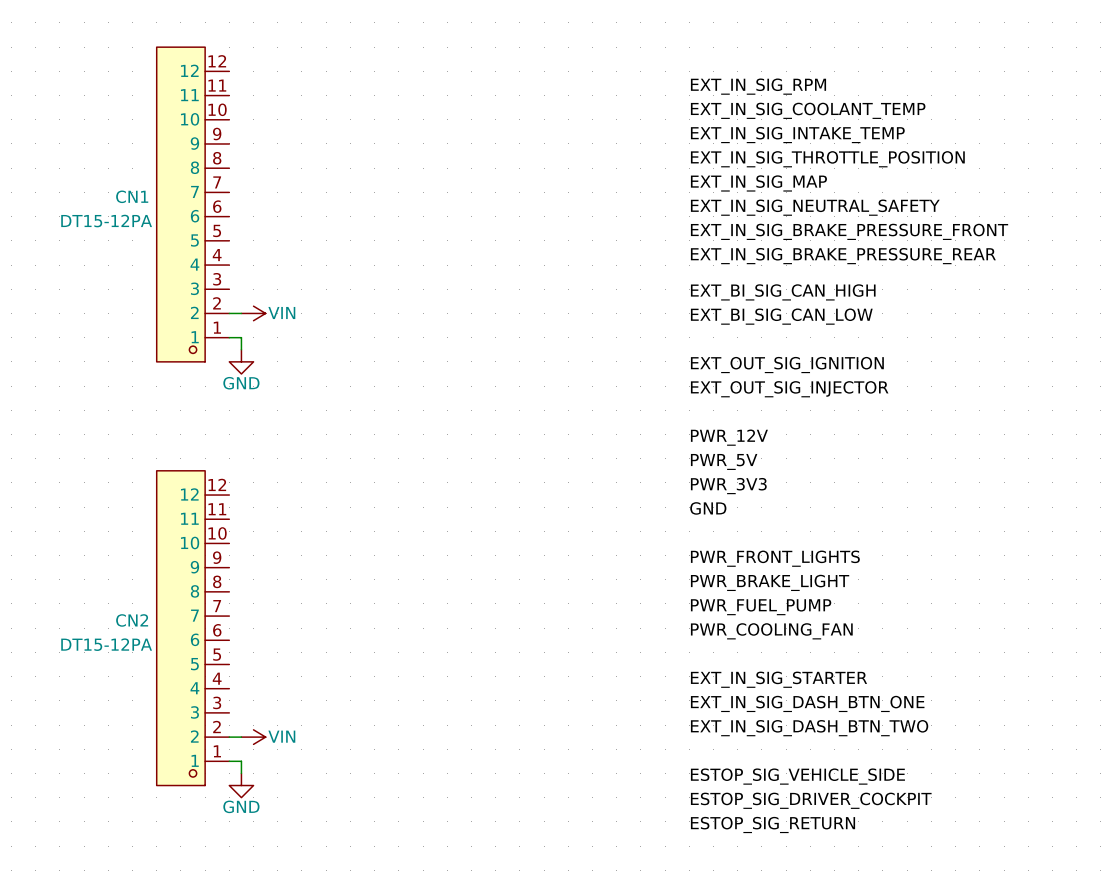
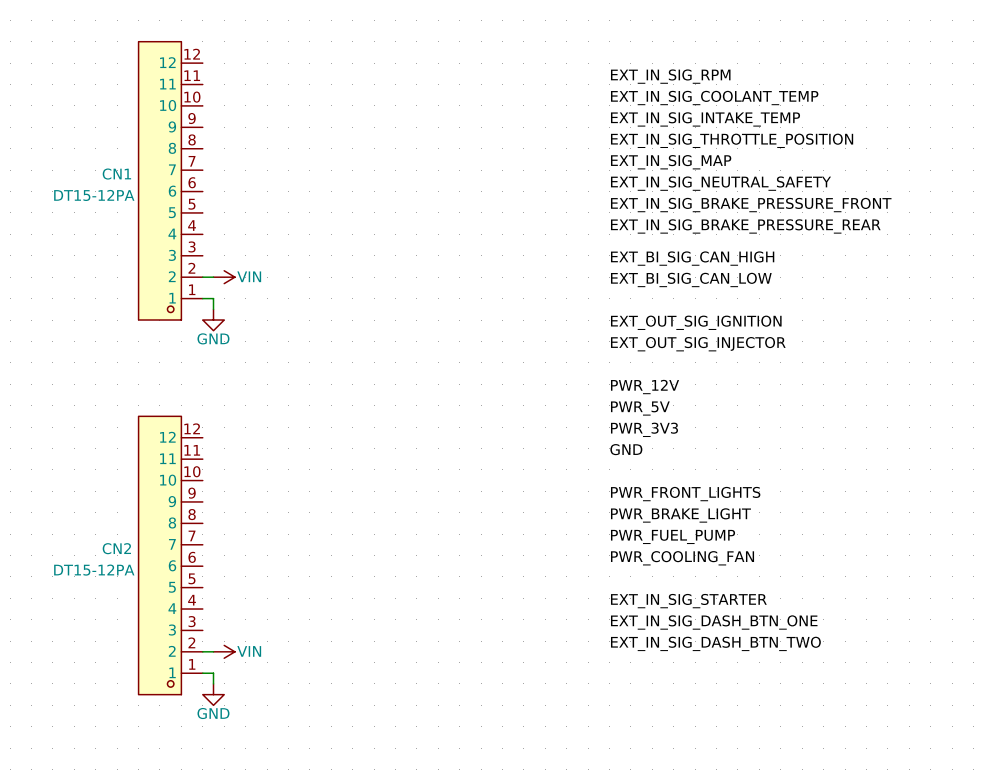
label: ESTOP_SIG_VEHICLE_SIDE (797, 776) -> none
label: ESTOP_SIG_DRIVER_COCKPIT (811, 800) -> none
label: ESTOP_SIG_RETURN (773, 824) -> none

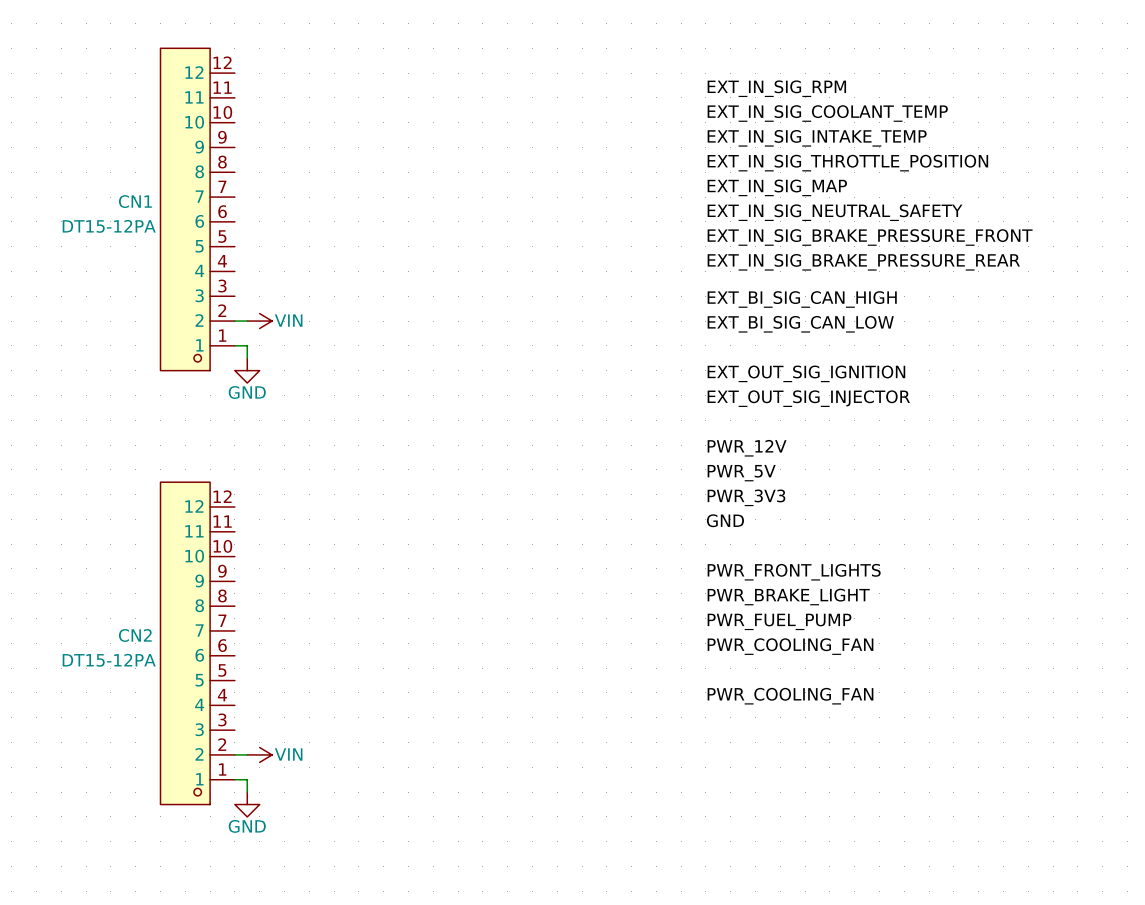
label: EXT_IN_SIG_STARTER (688, 601) -> PWR_COOLING_FAN (790, 696)
label: EXT_IN_SIG_DASH_BTN_ONE (714, 622) -> none
label: EXT_IN_SIG_DASH_BTN_TWO (715, 643) -> none

